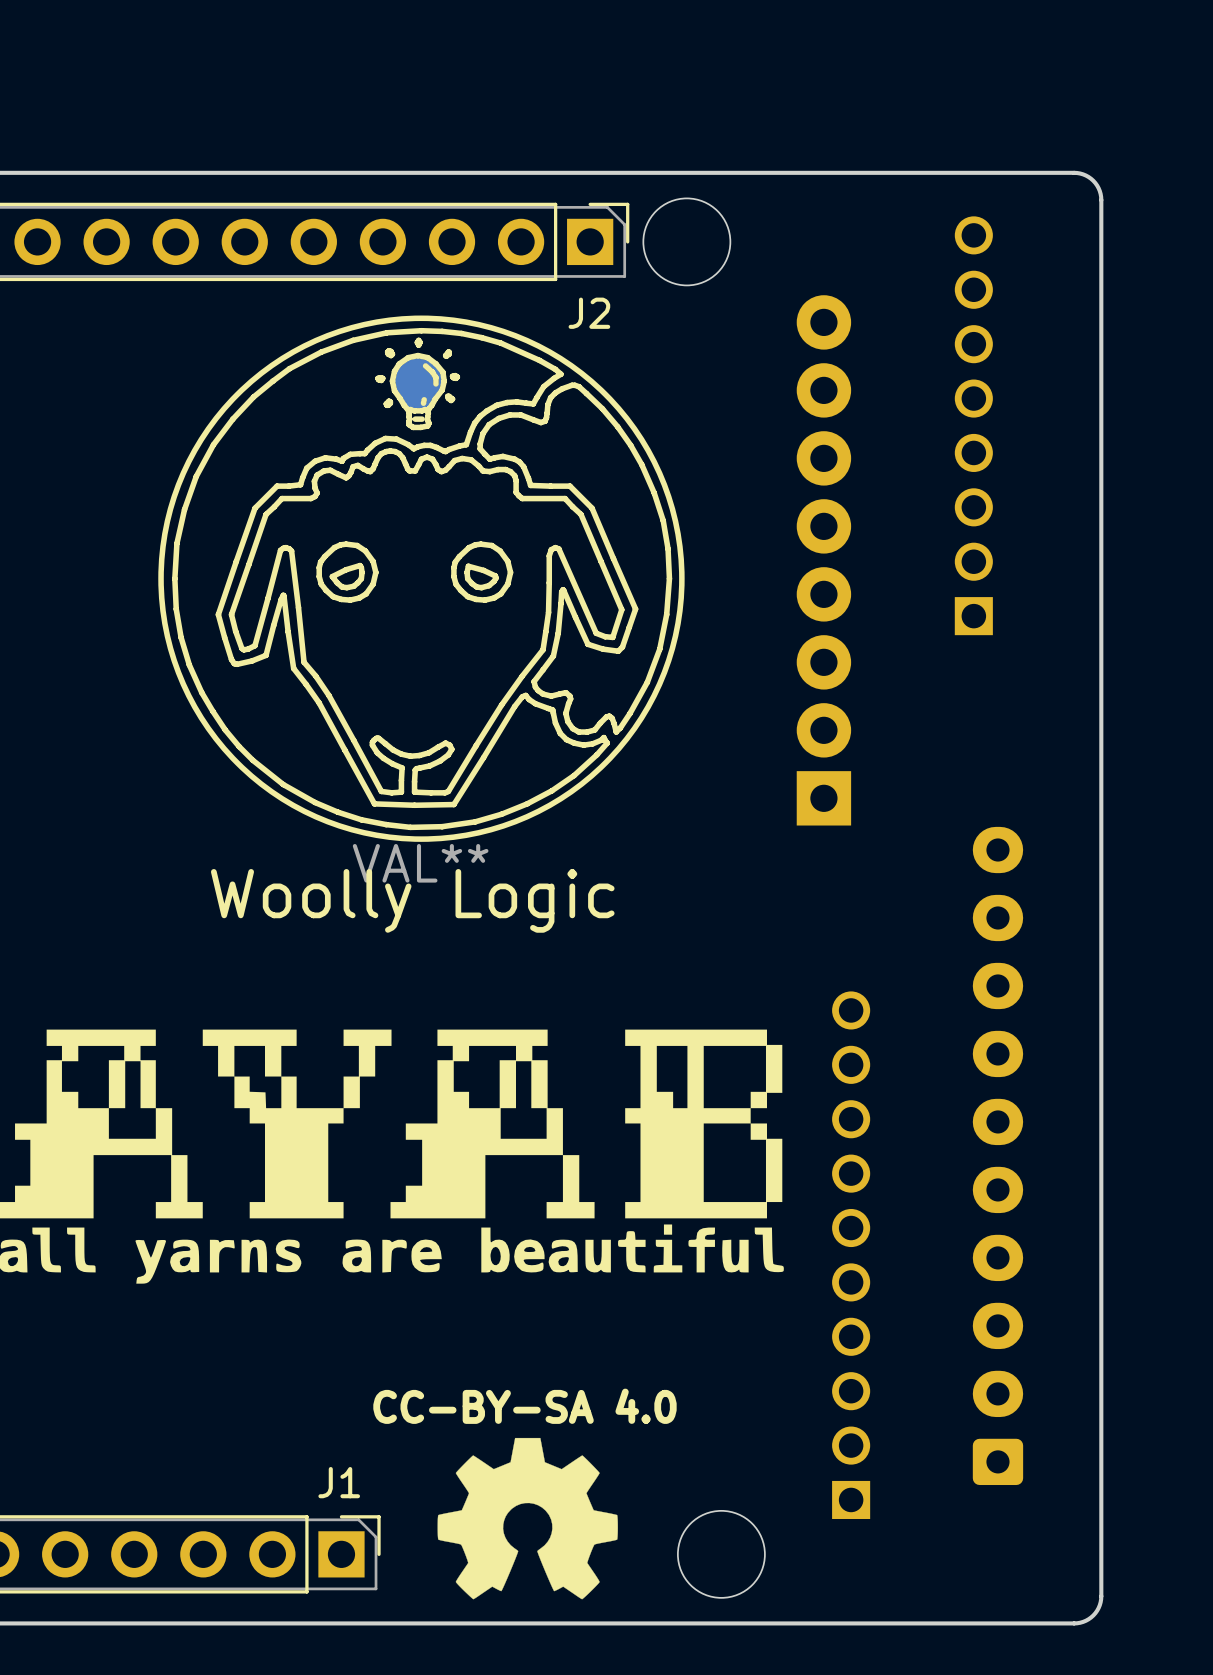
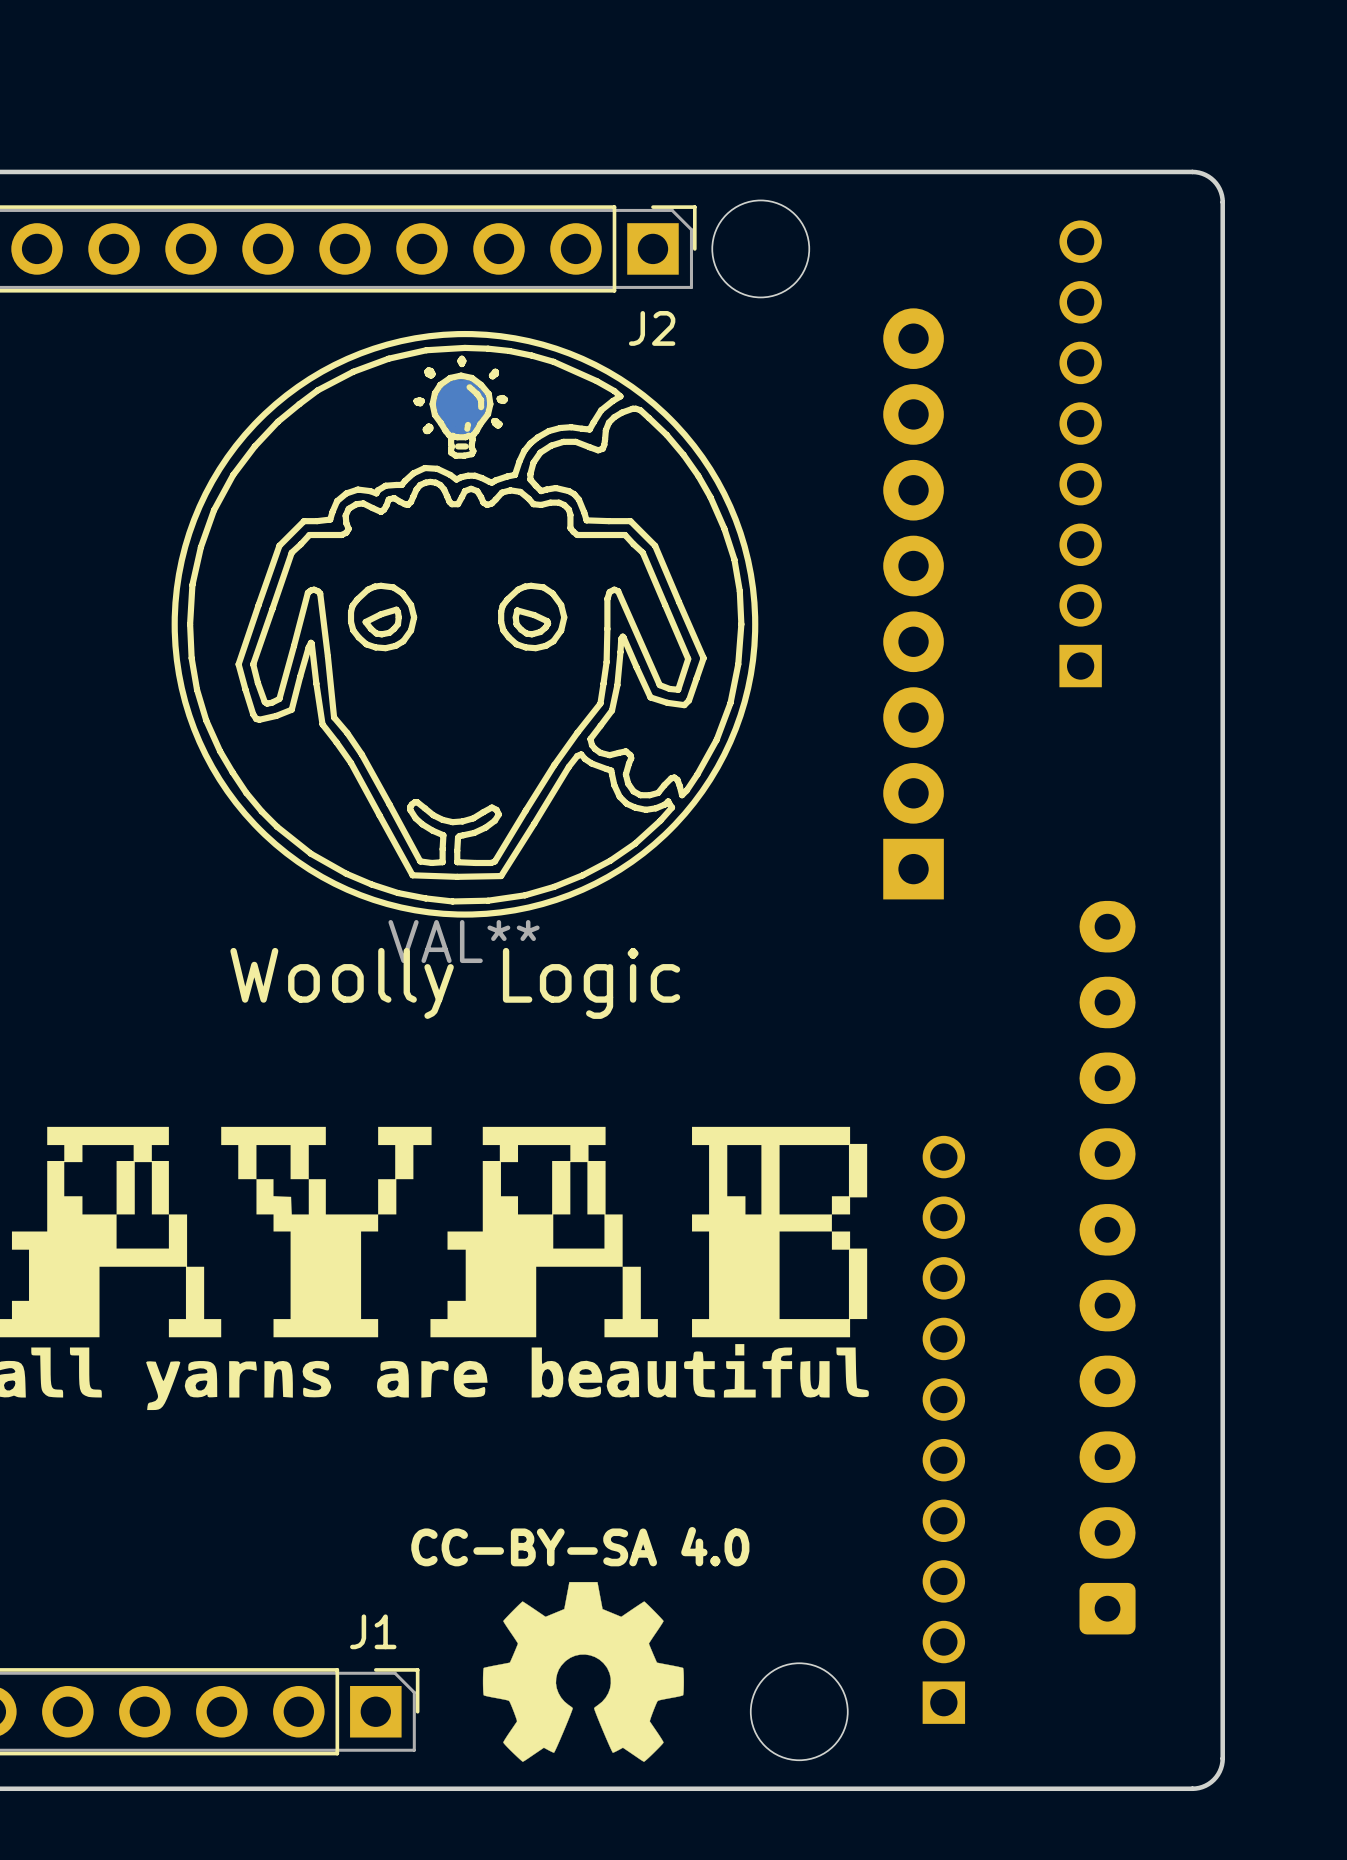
part position: (851, 1255) -> (943, 1429)

